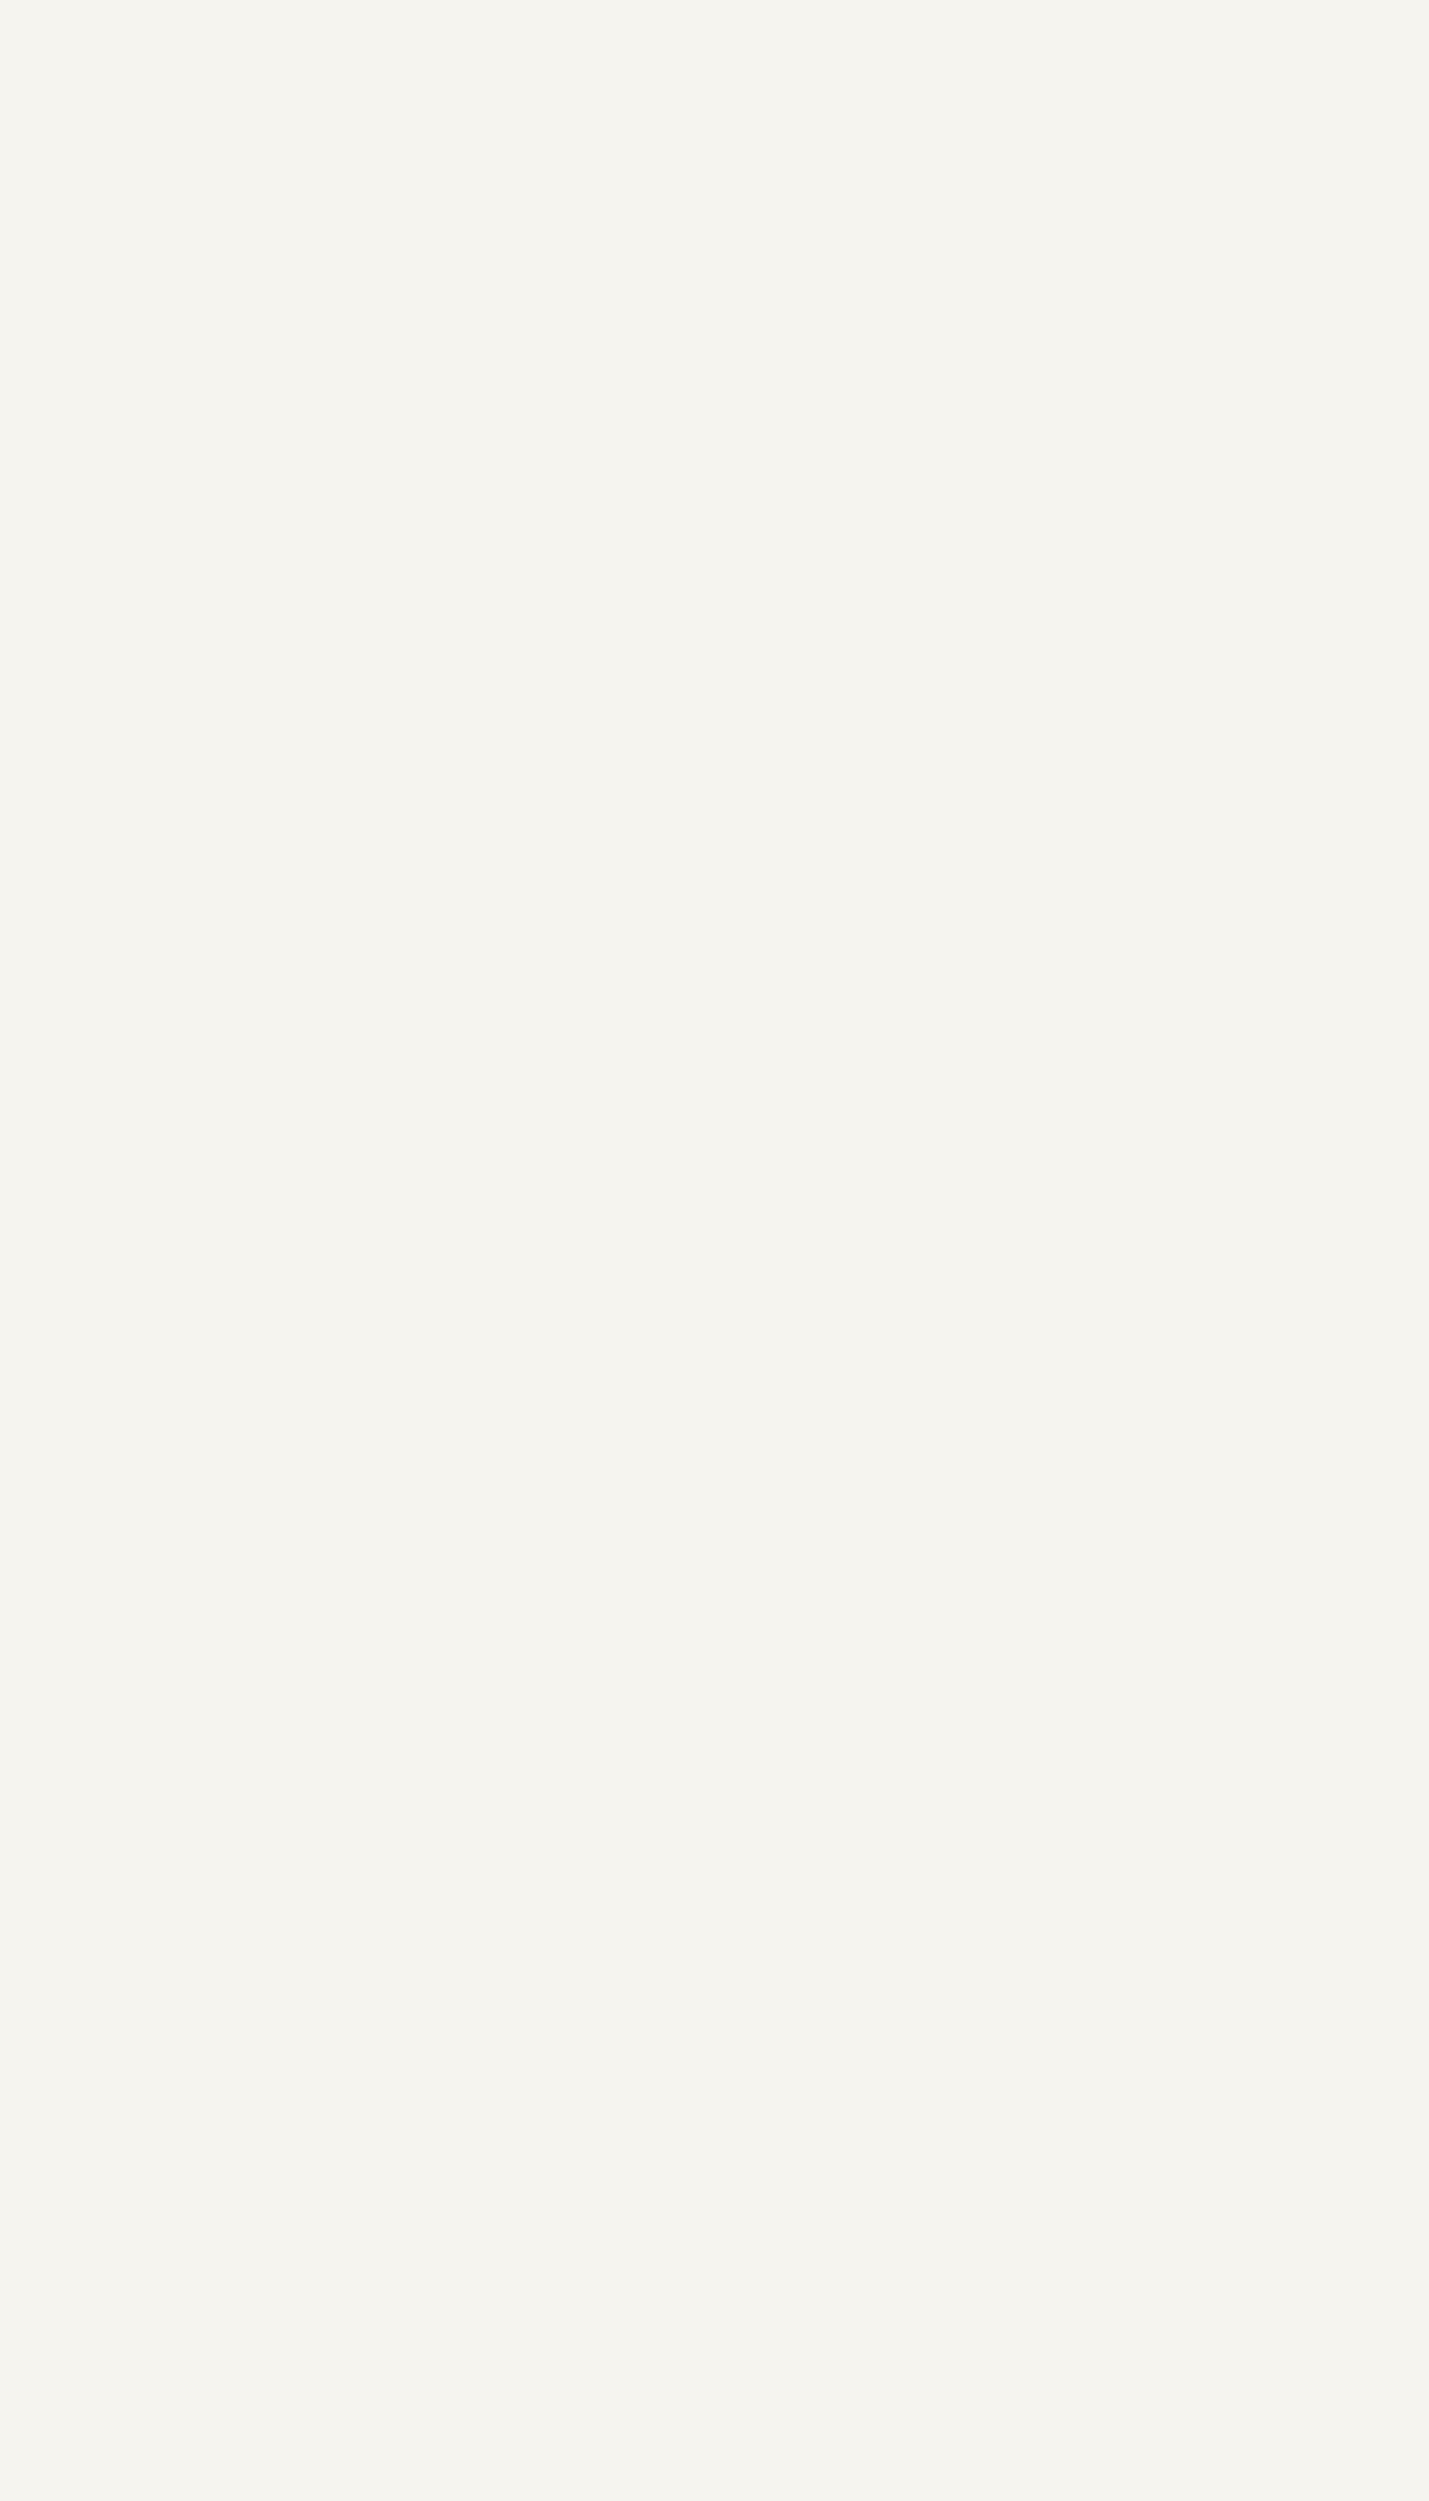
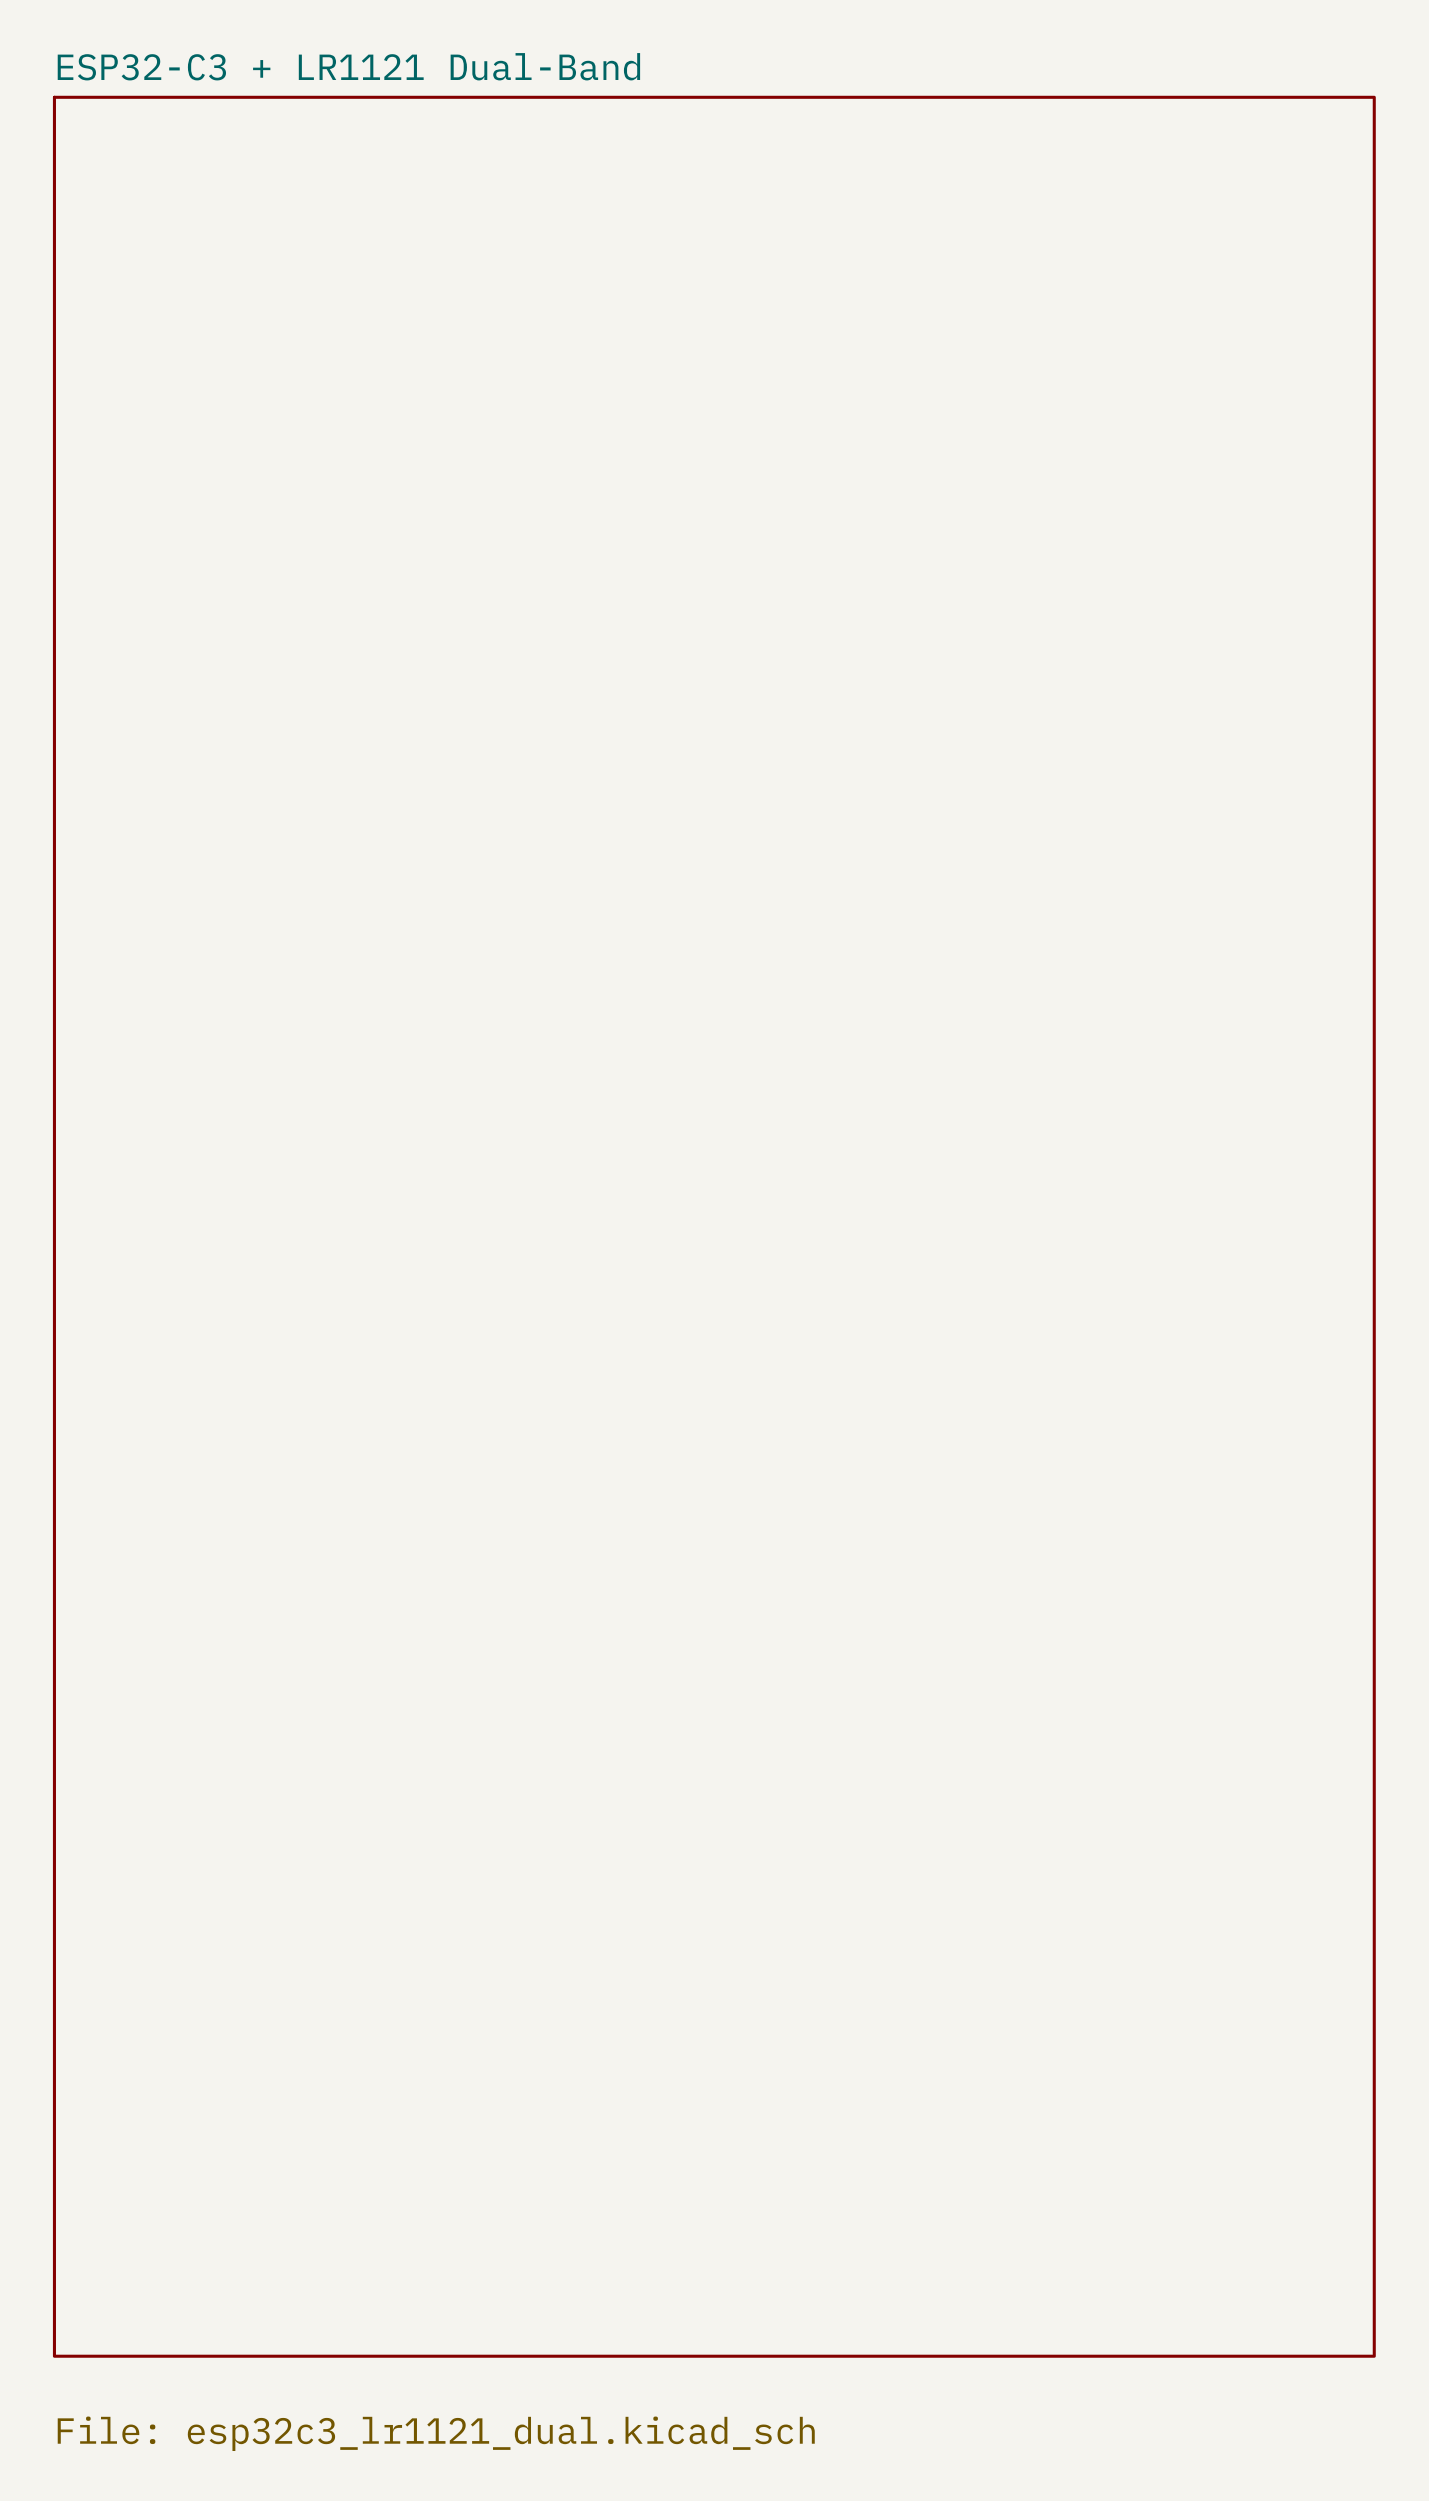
sheet ESP32-C3 + LR1121 Dual-Band: none -> File: esp32c3_lr1121_dual.kicad_sch (714, 1226)

